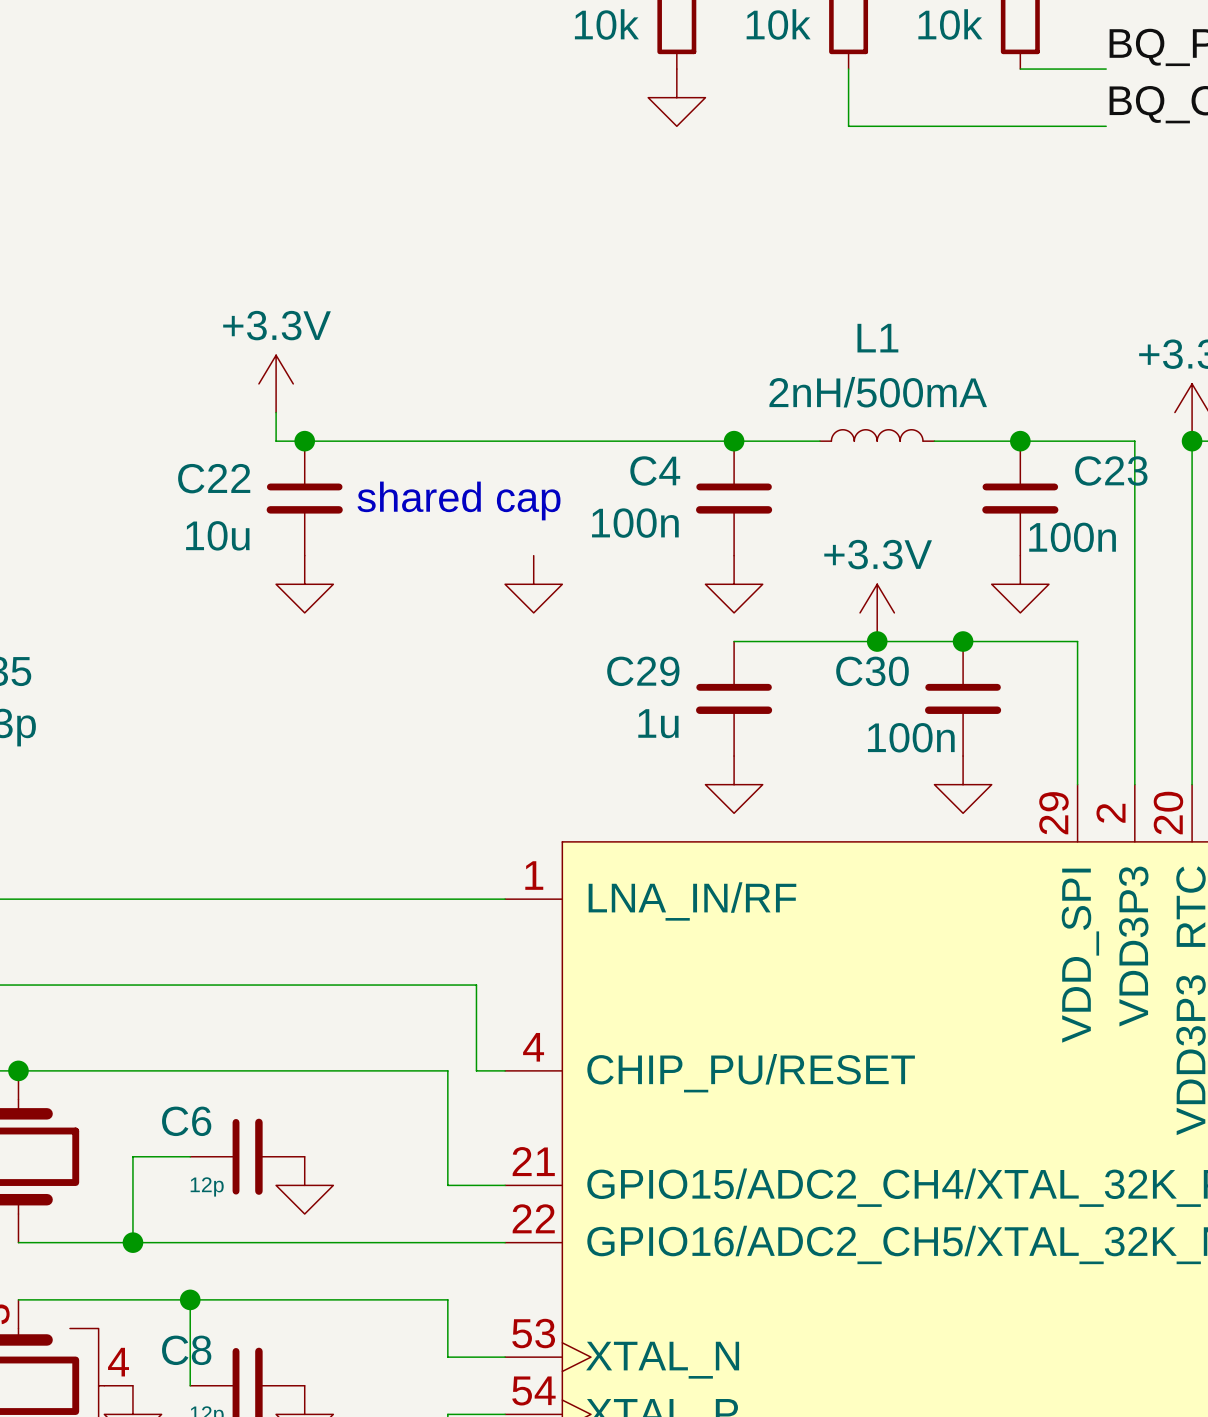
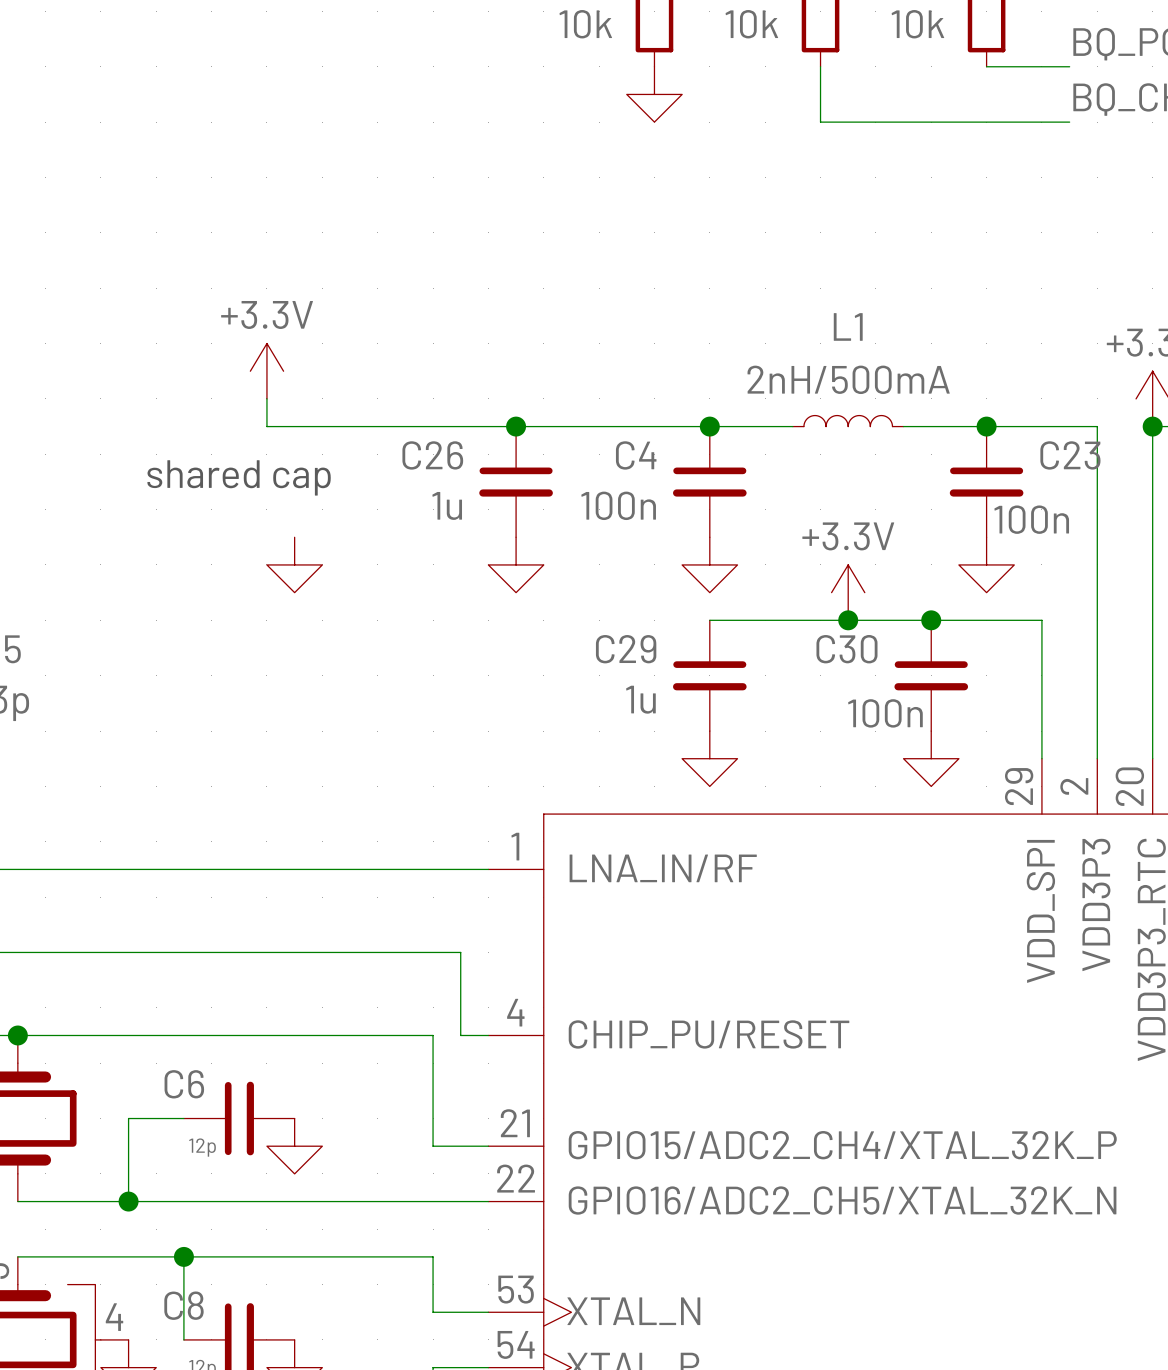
junction: (304, 441) -> none
junction: none -> (516, 426)
C22: 10u (304, 498) -> none
C26: none -> 1u (516, 481)
text position: shared cap (458, 500) -> shared cap (239, 477)

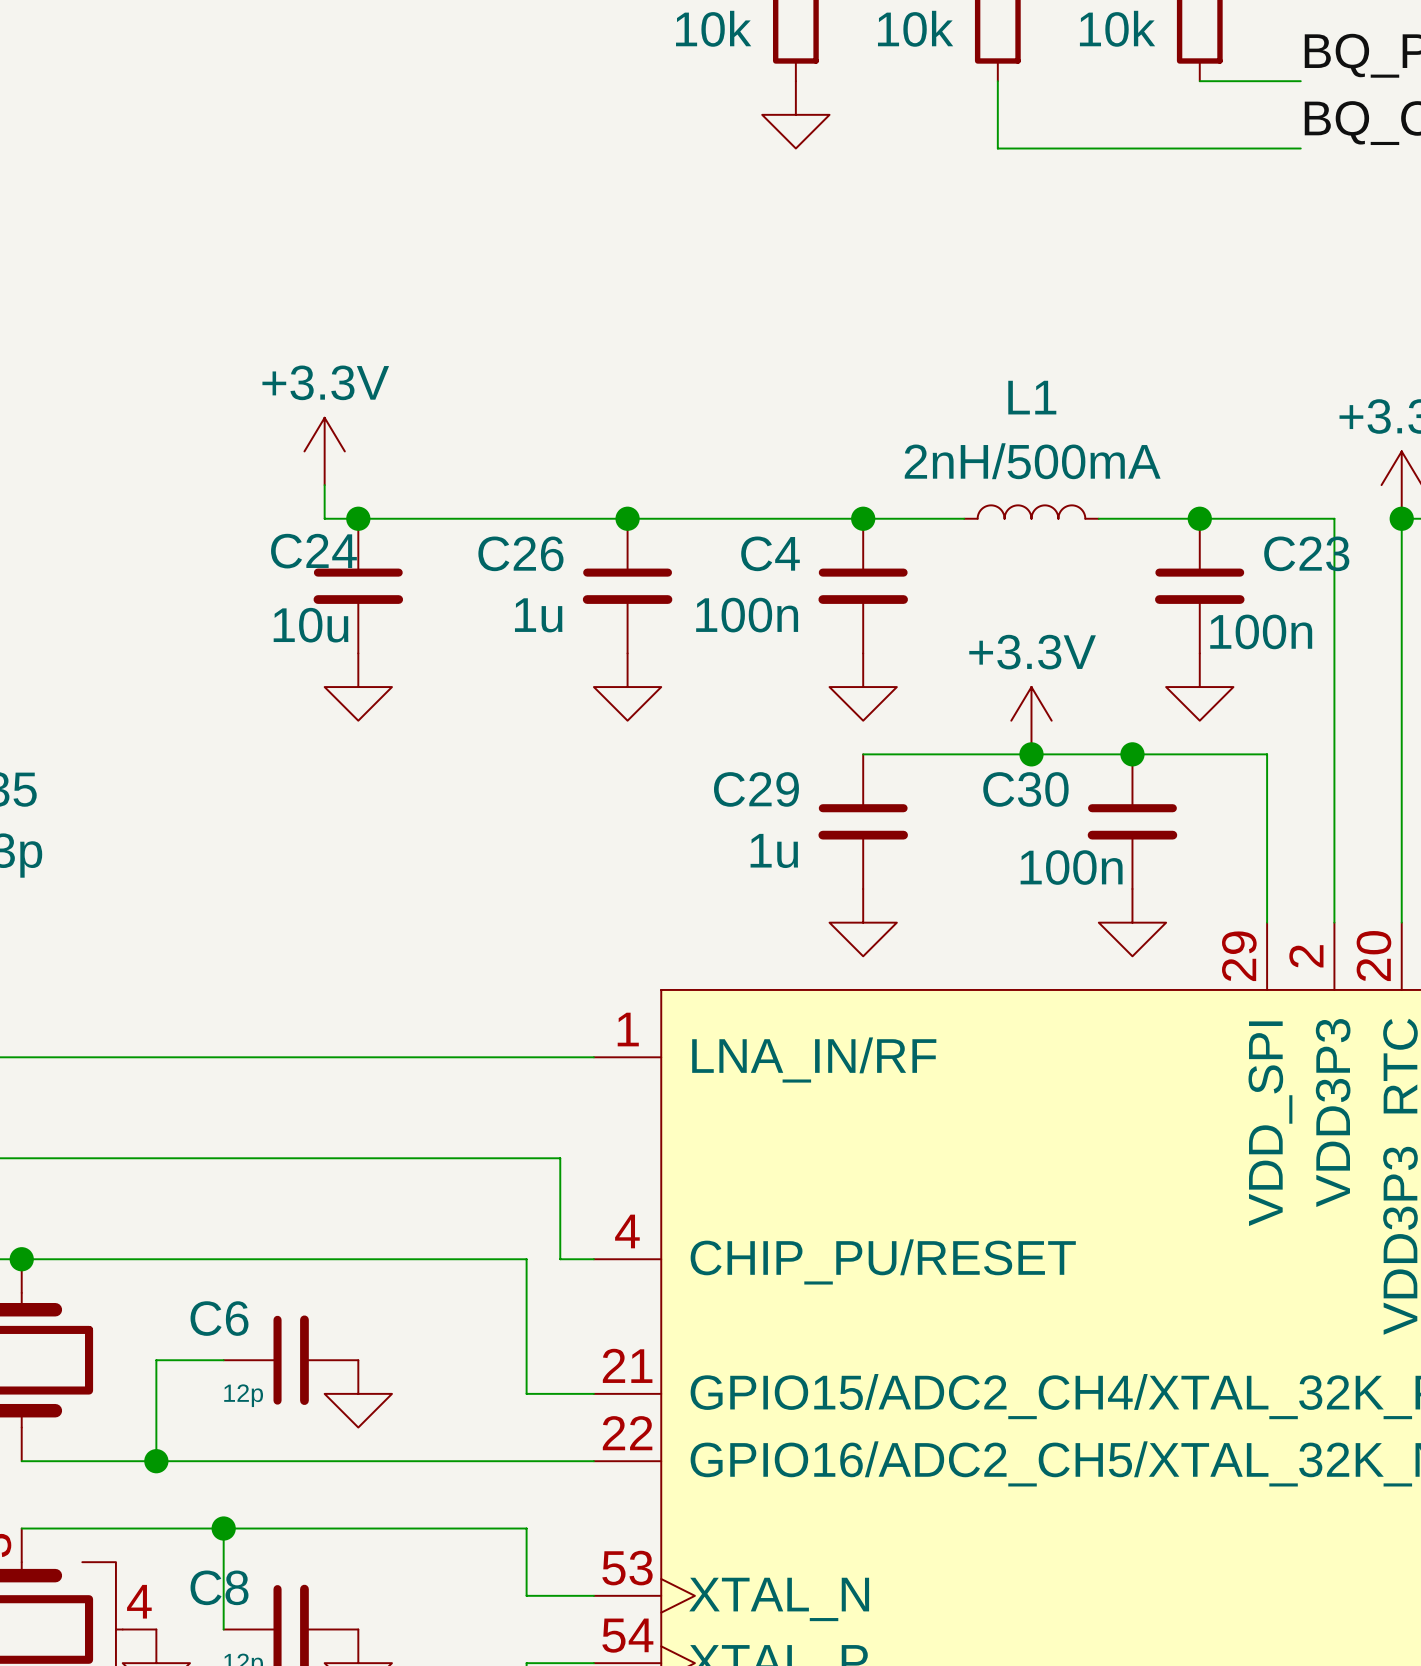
junction: none -> (358, 518)
text: shared cap (239, 477) -> none
C24: none -> 10u (358, 586)

